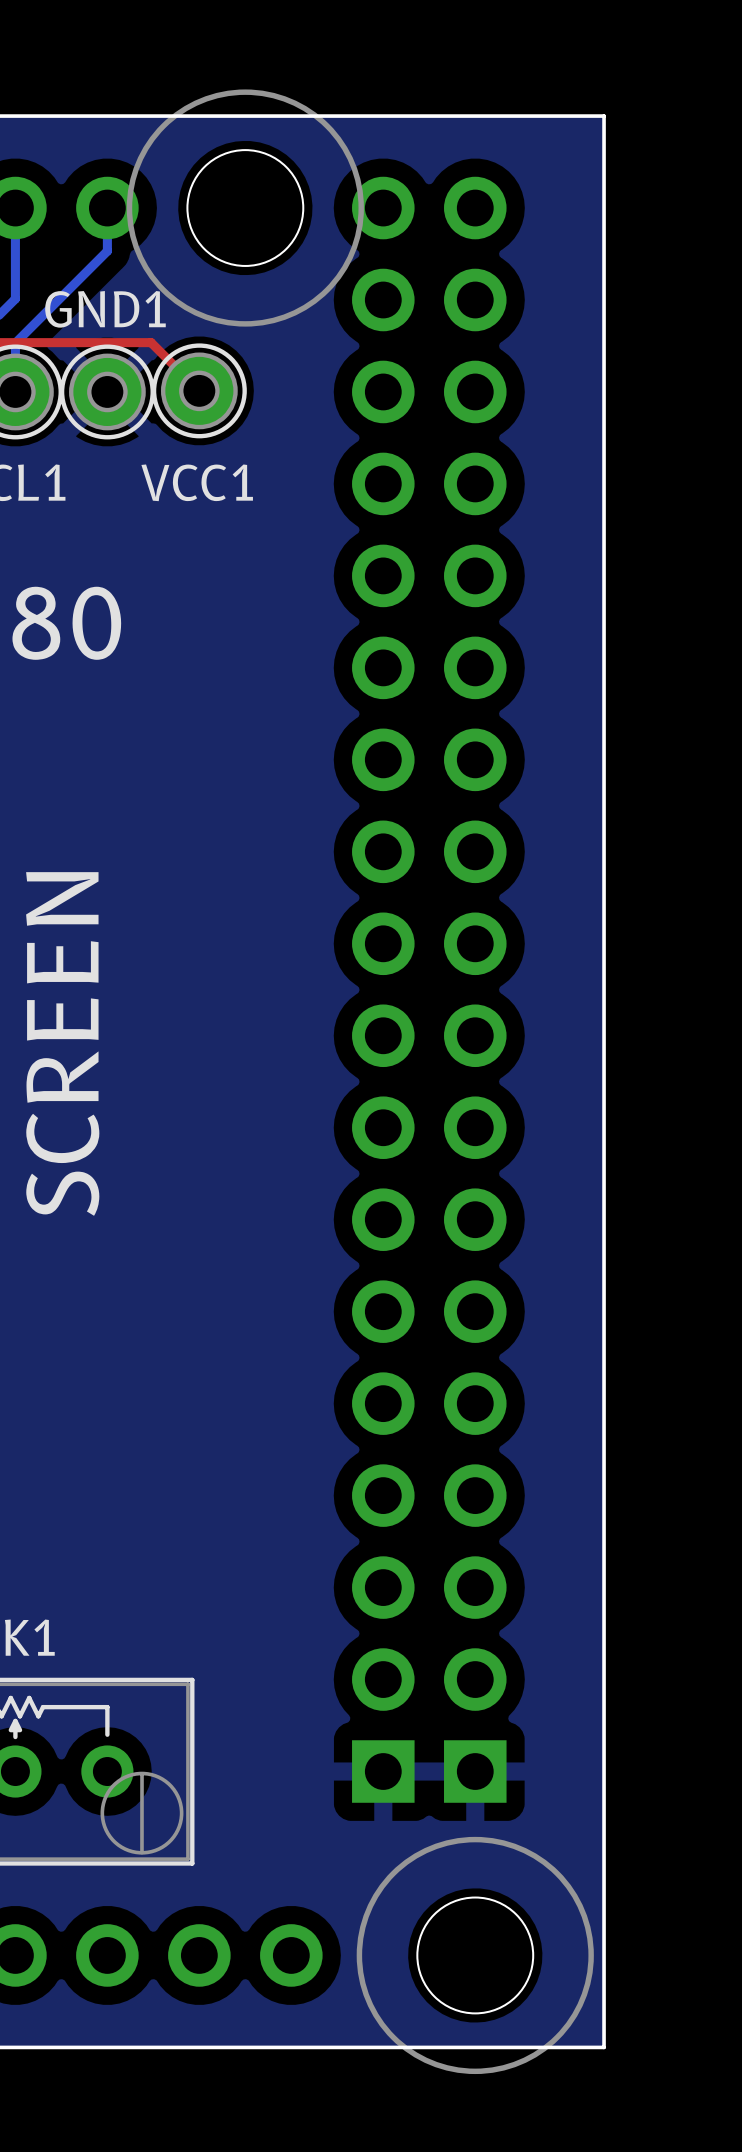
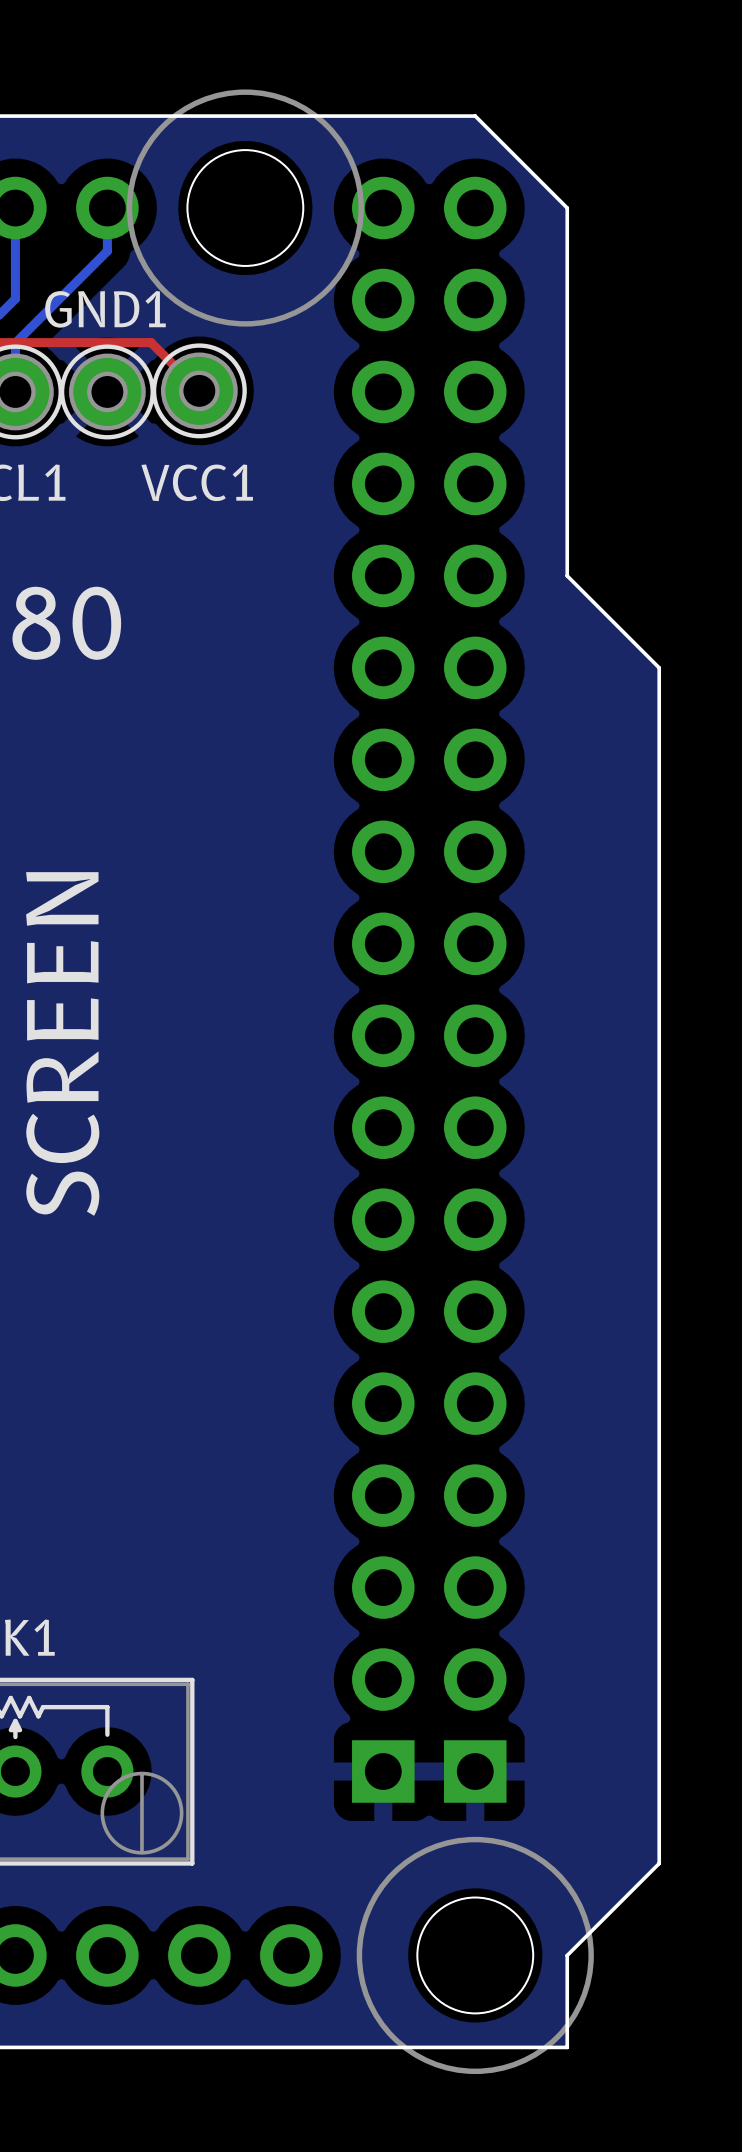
board edge: (475, 116) (604, 116) (604, 2047) (567, 2047) -> (475, 116) (567, 208) (567, 575) (659, 667) (659, 1863) (567, 1955) (567, 2047)

